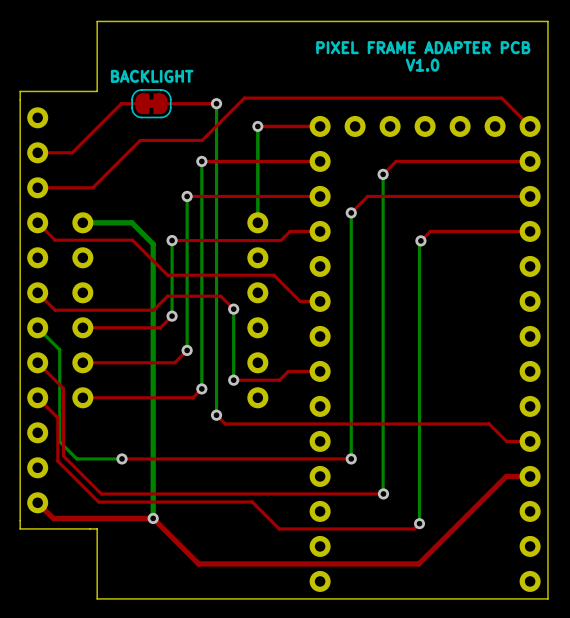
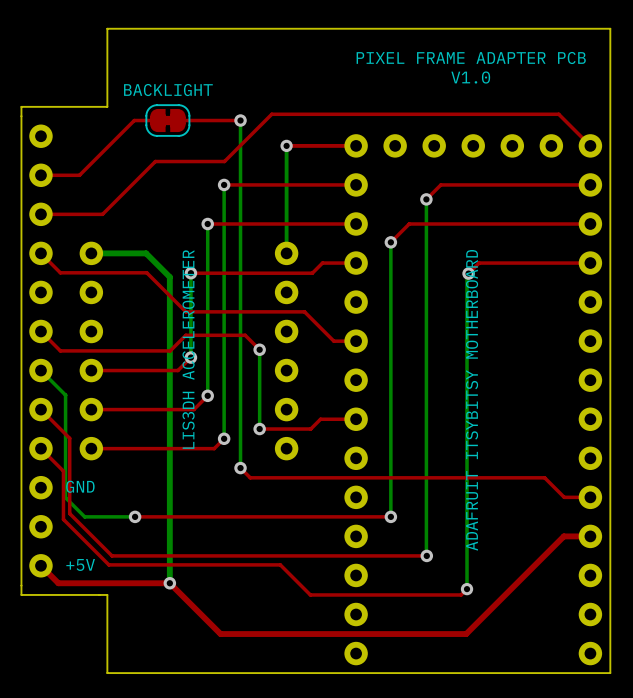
text: none -> LIS3DH ACCELEROMETER (188, 349)
text: none -> ADAFRUIT ITSYBITSY MOTHERBOARD (472, 400)
text: none -> GND (80, 486)
text: none -> +5V (80, 564)

